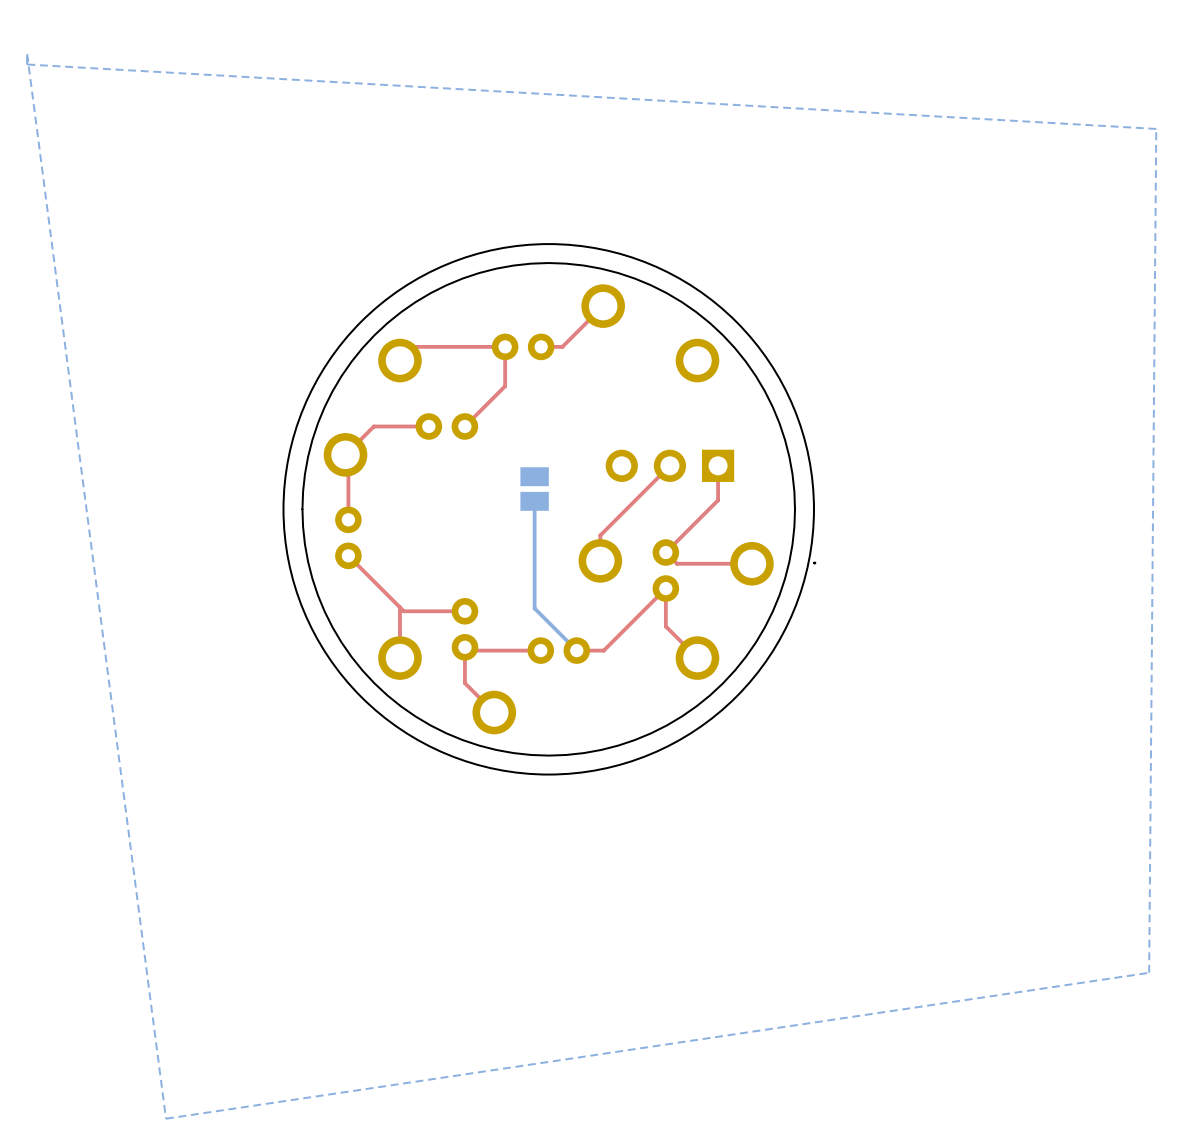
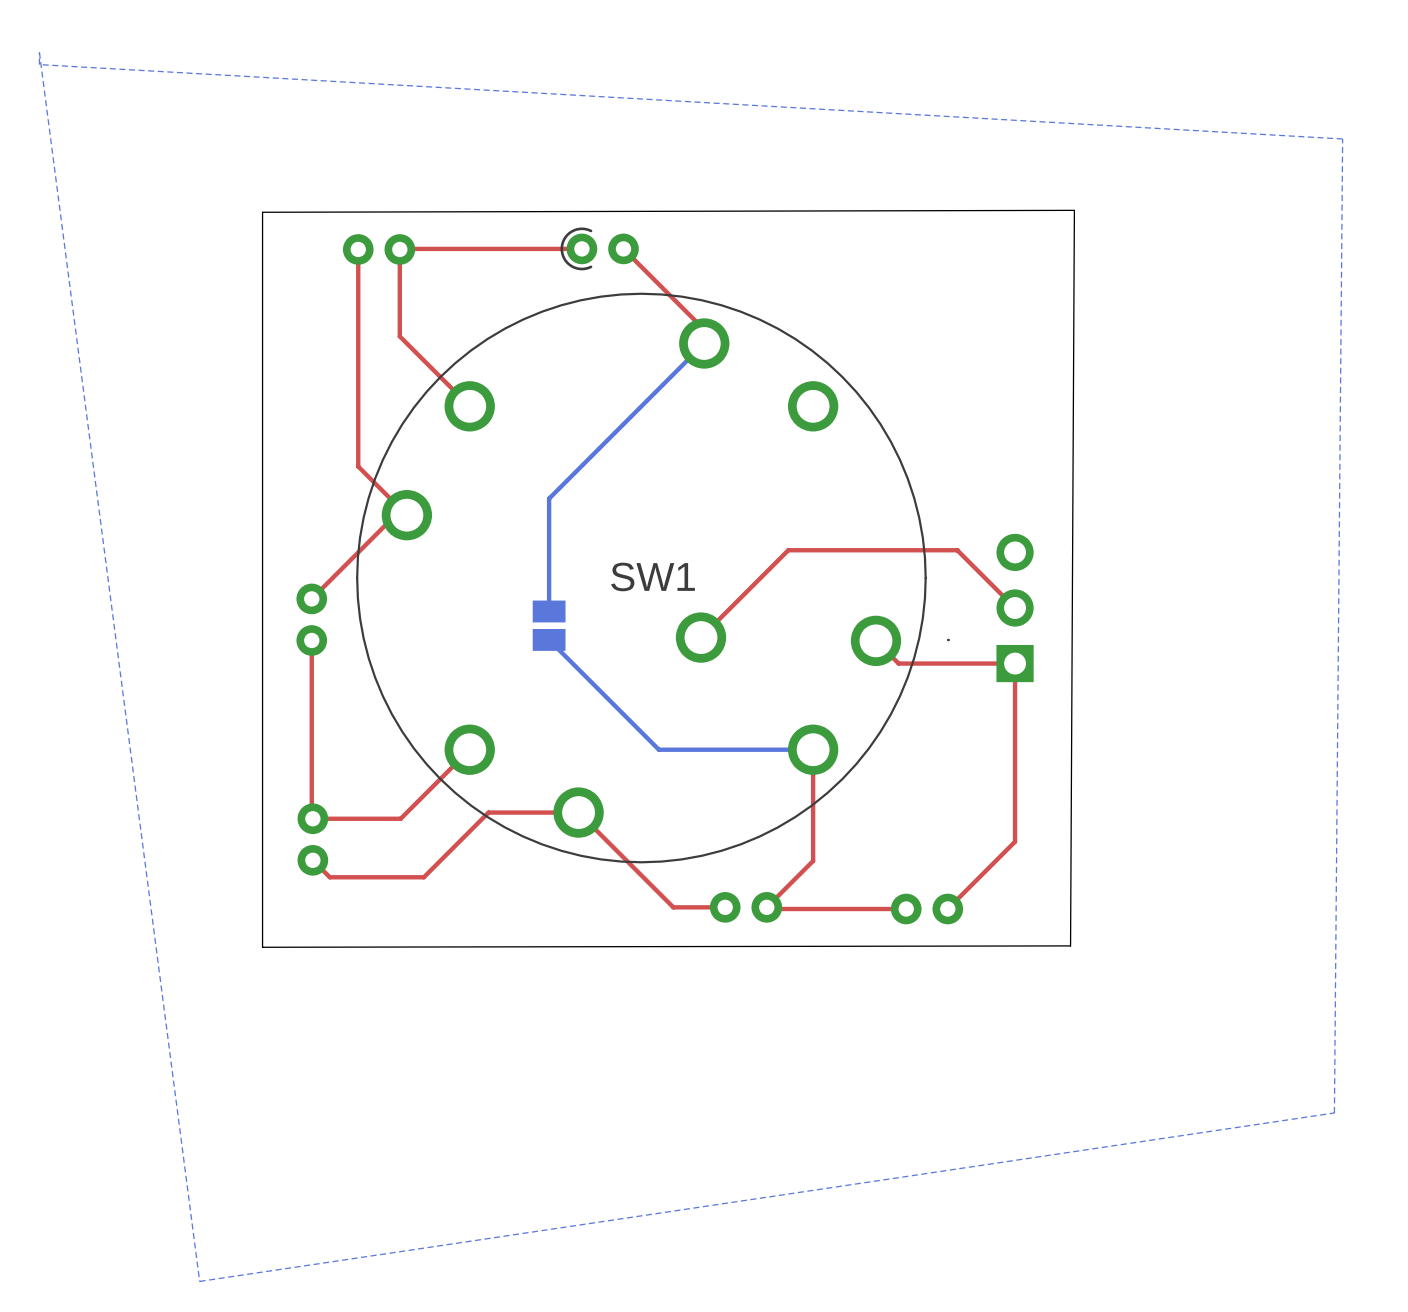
board edge: none -> (1074, 210) (262, 212) (262, 947) (1070, 945) (1074, 210)
top track: none -> (358, 249) (358, 466) (406, 515)
part: none -> (379, 249)
top track: none -> (623, 248) (704, 329)
round board edge: [283, 243, 815, 776] -> none
top track: (603, 306) (562, 346) (541, 346) -> none
bottom track: none -> (704, 343) (549, 498) (549, 611)
part side: bottom (523, 346) -> top (599, 248)
top track: (399, 360) (413, 346) (505, 346) (505, 386) (464, 426) -> (469, 406) (399, 336) (399, 249) (581, 248)
top track: (428, 426) (373, 426) (345, 454) (348, 457) (348, 519) -> none
part: (446, 426) -> none
top track: none -> (395, 515) (311, 598)
top track: (669, 465) (600, 535) (600, 560) -> (1015, 607) (957, 550) (788, 550) (700, 637)
part rotation: 0° (669, 465) -> 90° clockwise (1015, 607)
part position: (669, 465) -> (1015, 607)
top track: (718, 465) (718, 500) (665, 552) (677, 563) (751, 563) -> (947, 908) (1015, 841) (1015, 663) (898, 663) (875, 640)
part position: (534, 489) -> (549, 625)
bottom track: (534, 501) (534, 608) (576, 650) -> none
SW1 name: none -> SW1 (653, 576)
part position: (348, 537) -> (311, 619)
top track: (348, 555) (403, 611) (464, 611) -> none
bottom track: none -> (549, 639) (658, 749) (813, 749)
part: (665, 570) -> none
top track: (399, 607) (399, 658) -> (311, 640) (312, 818) (400, 818) (469, 749)
part: (464, 629) -> none
top track: (540, 650) (468, 650) (464, 647) (464, 683) (494, 712) -> none
part: (558, 650) -> none
top track: (576, 650) (603, 650) (665, 588) (665, 626) (697, 658) -> (906, 908) (768, 908) (766, 907) (813, 861) (813, 749)
part: none -> (312, 839)
top track: none -> (312, 860) (329, 877) (423, 877) (488, 812) (578, 812) (673, 907) (725, 907)
part: none -> (745, 907)
part: none -> (927, 908)

